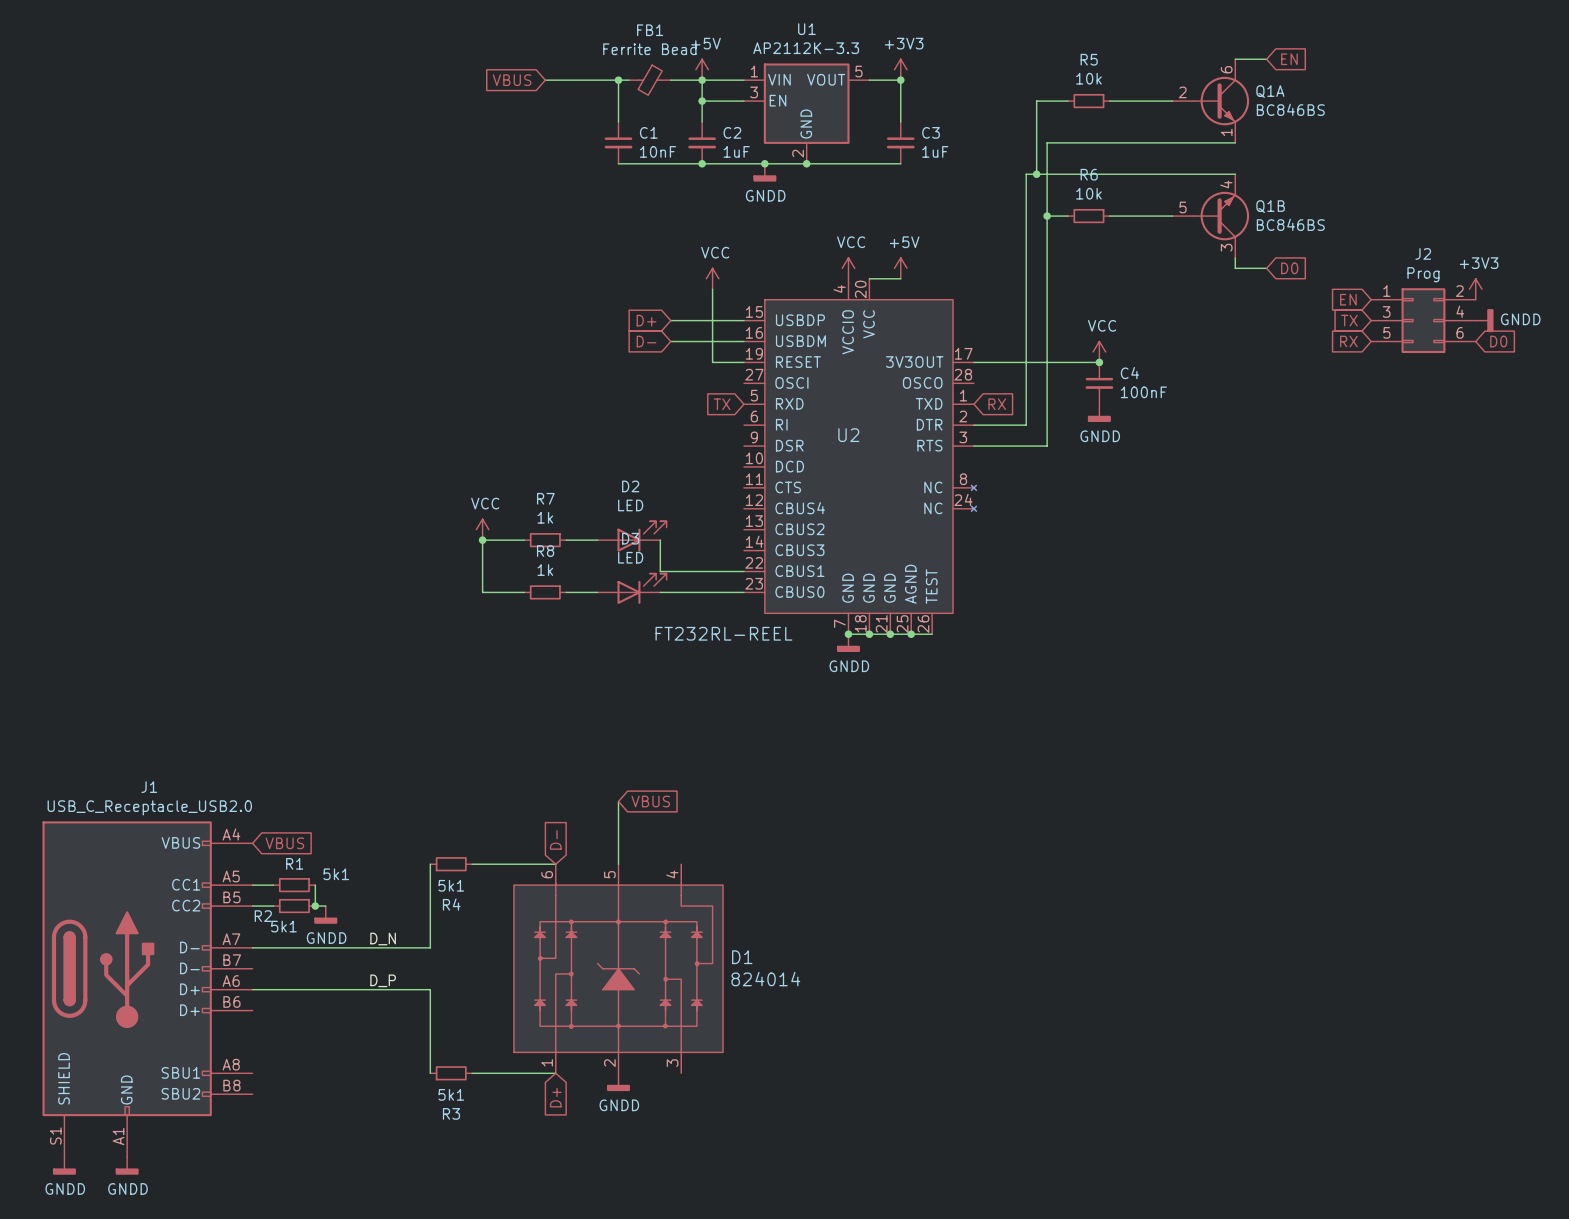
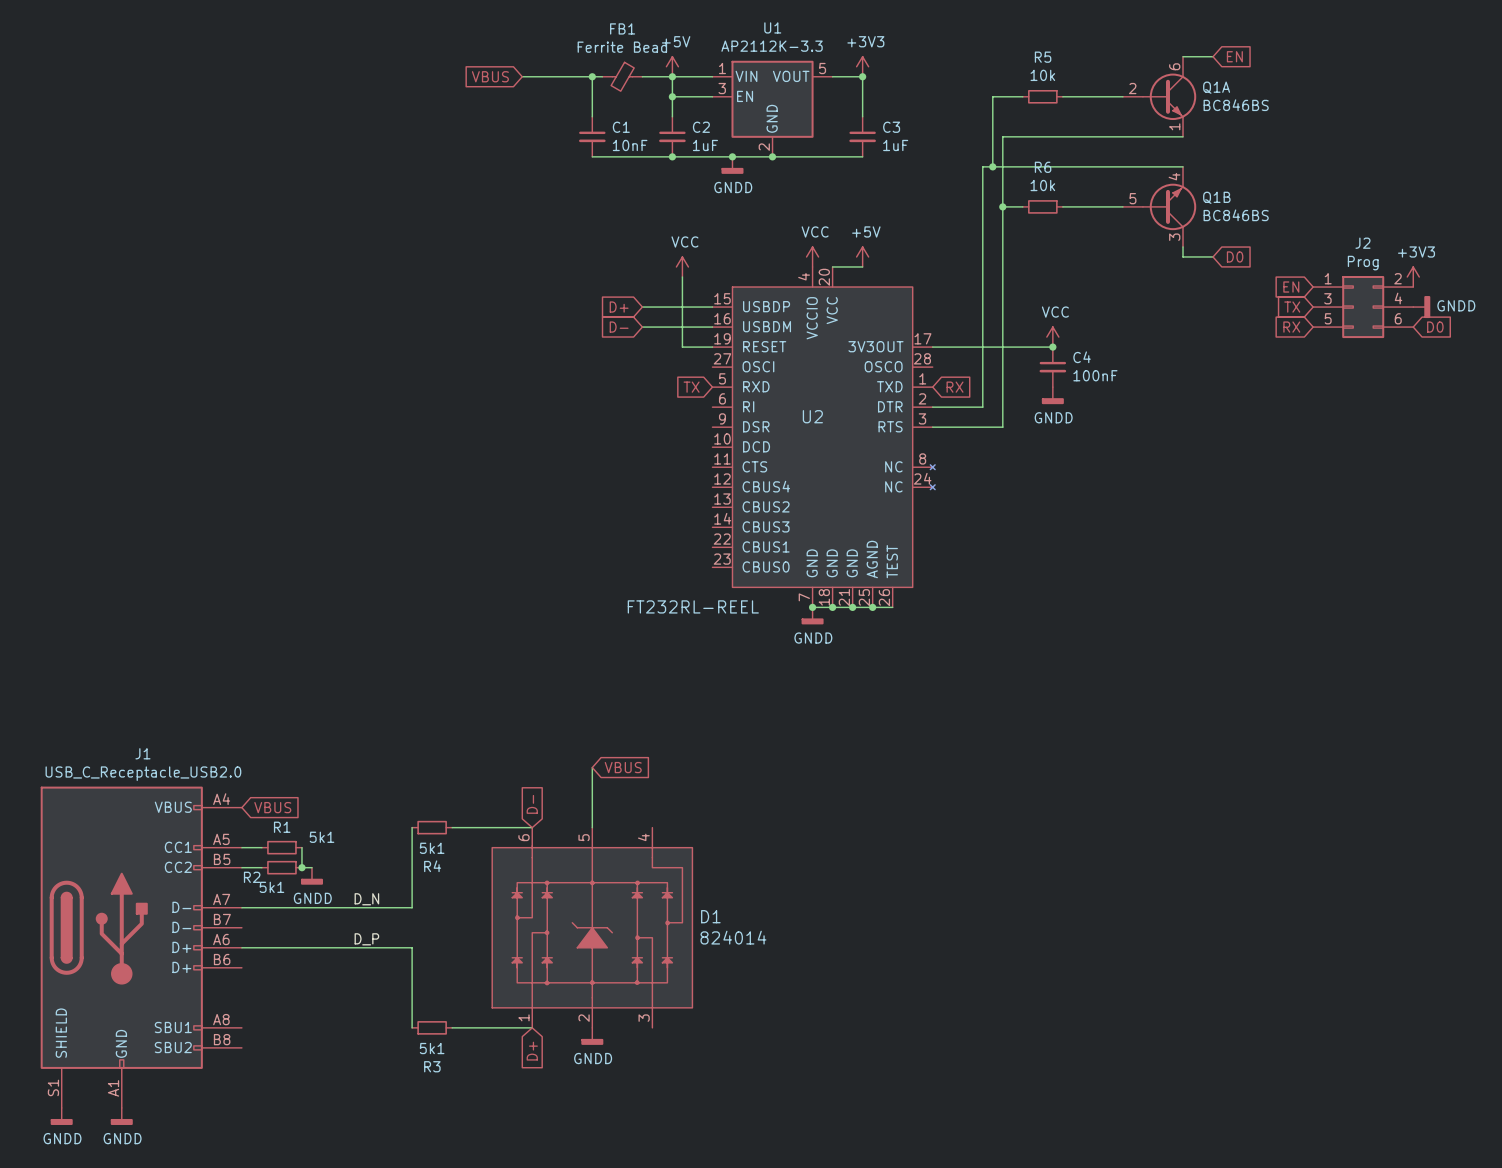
power symbol: VCC (482, 529) -> none
D2: LED (632, 536) -> none
junction: (482, 540) -> none
wire: (524, 540) (482, 540) (482, 592) (524, 592) -> none
R7: 1k (545, 540) -> none
wire: (566, 540) (597, 540) -> none
wire: (660, 540) (660, 571) (743, 571) -> none
D3: LED (632, 588) -> none
R8: 1k (545, 592) -> none
wire: (566, 592) (597, 592) -> none
wire: (660, 592) (743, 592) -> none

